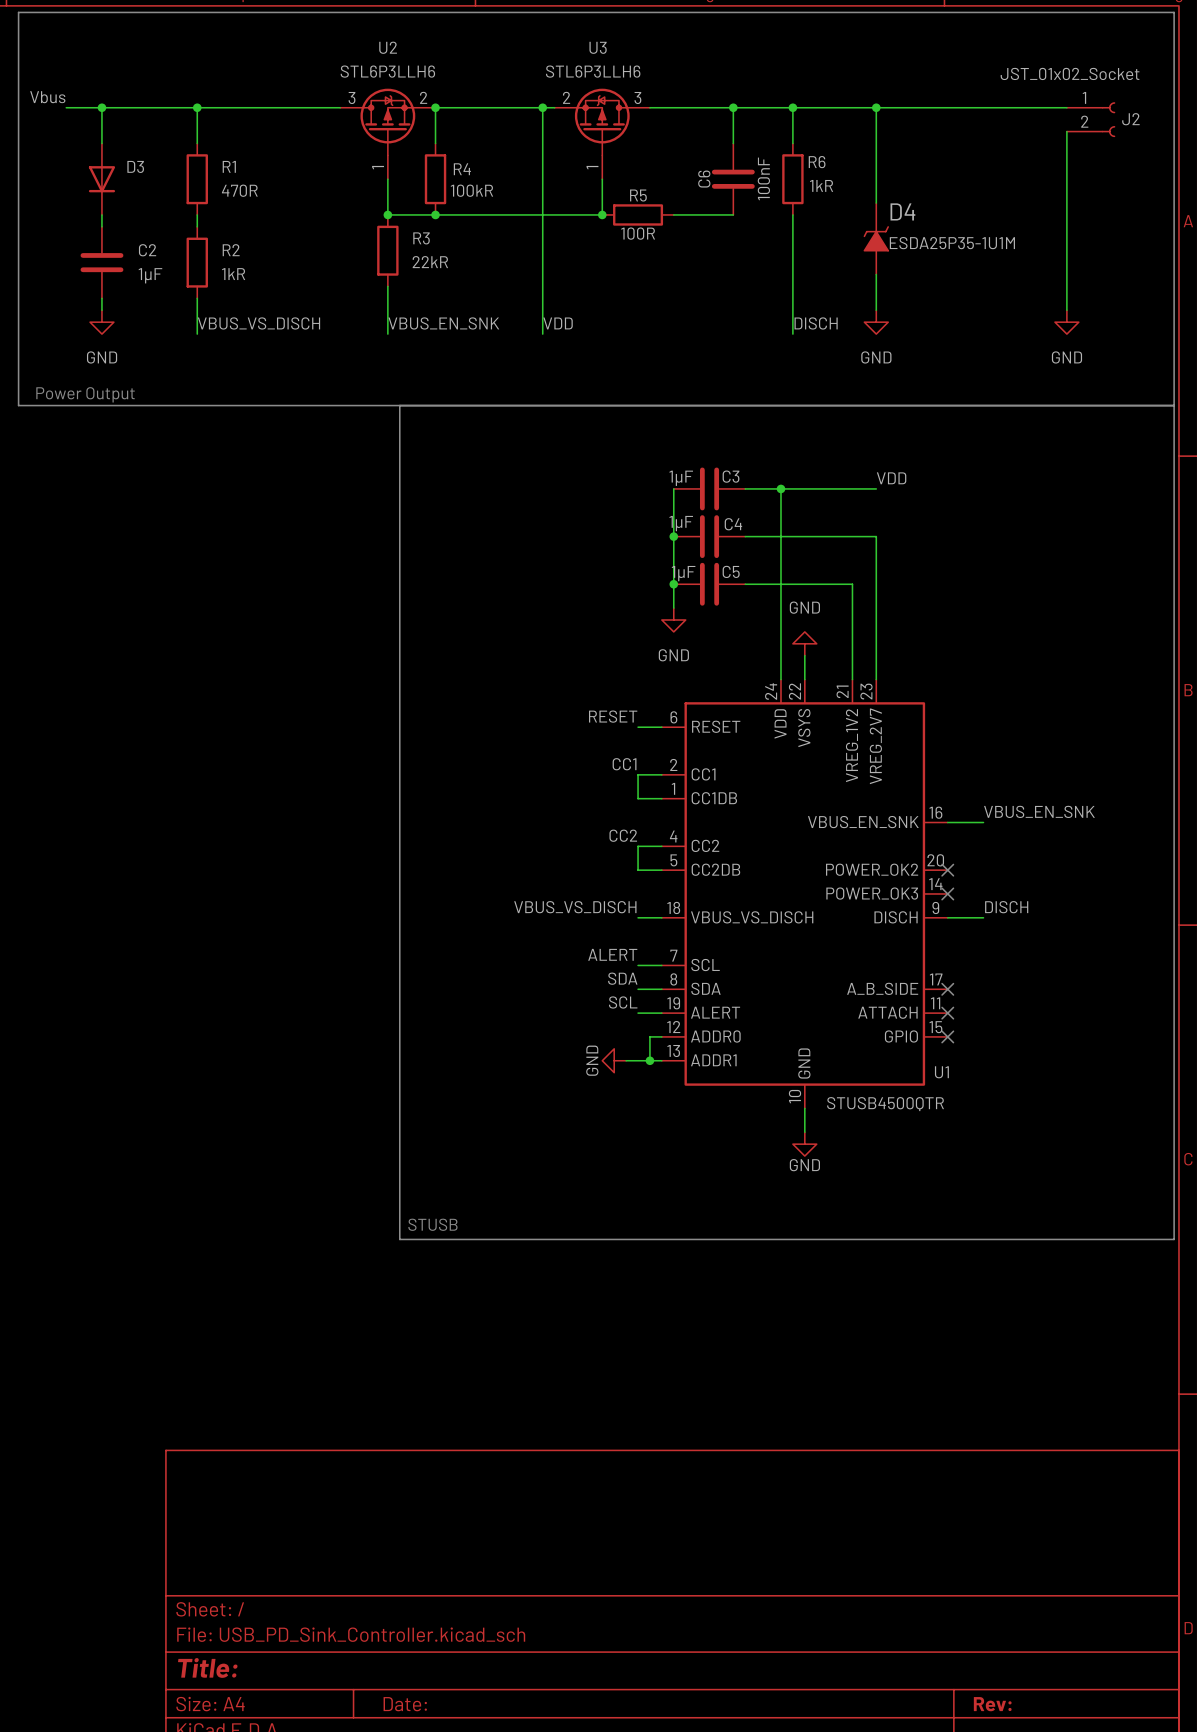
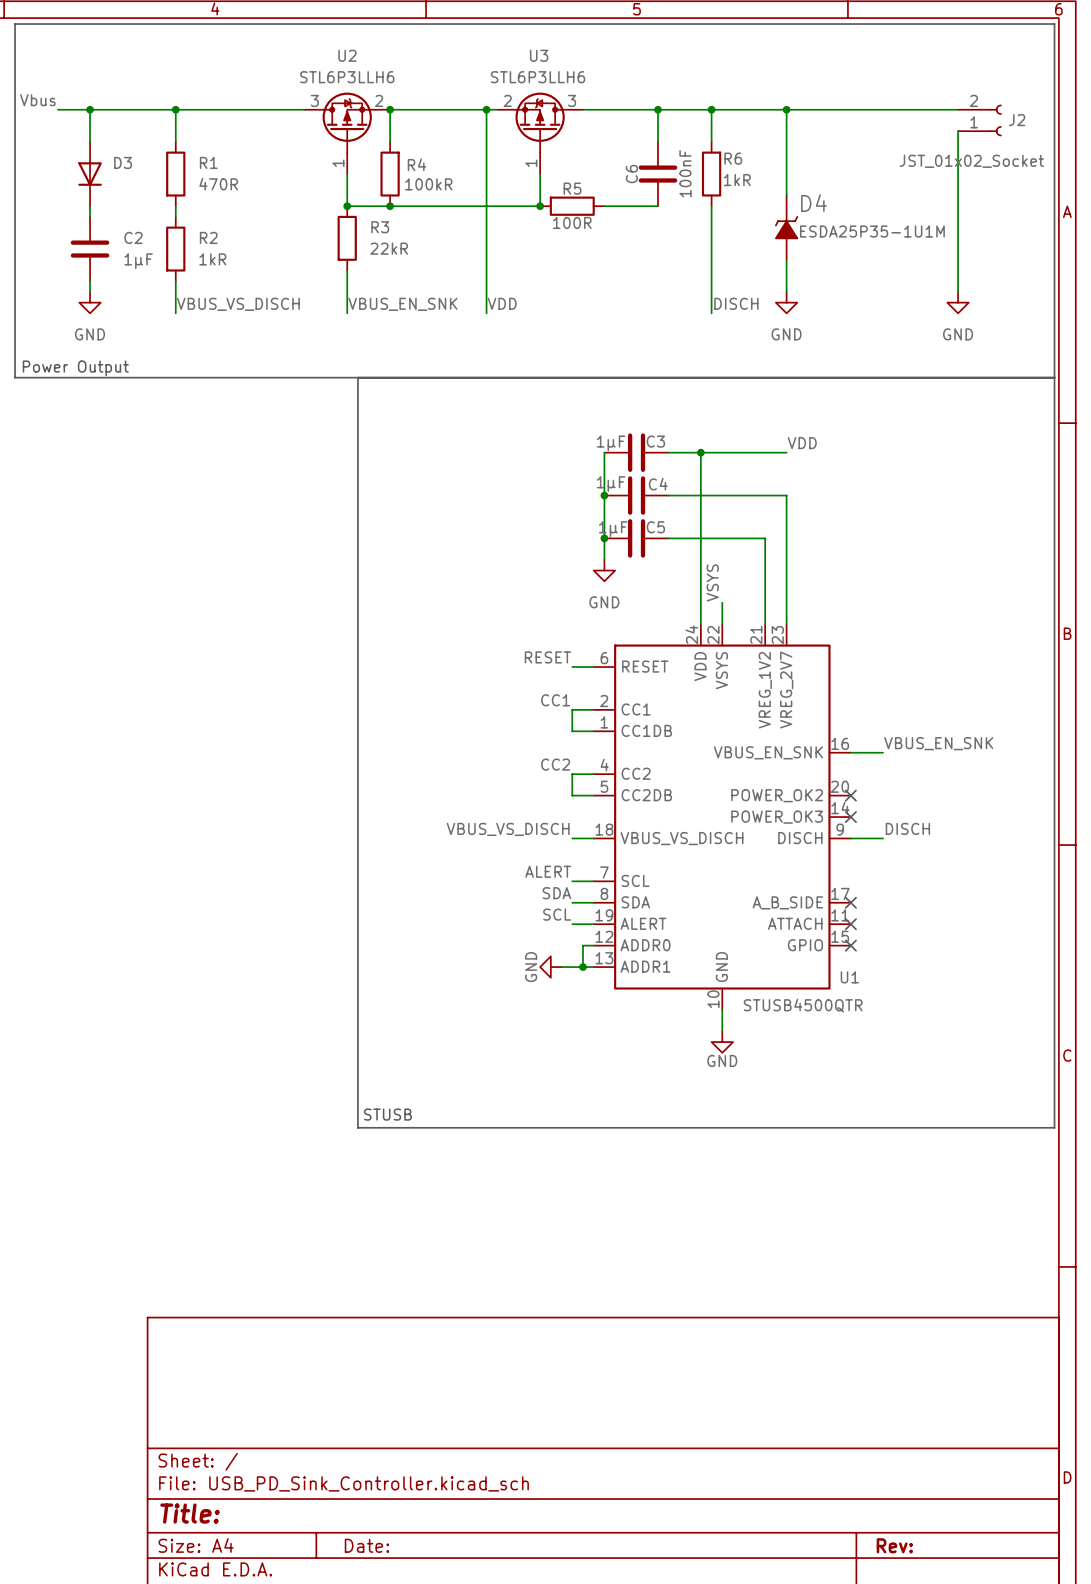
J2 flip: as is (1108, 119) -> up-down (995, 120)
label: none -> VSYS (712, 582)
power symbol: GND (804, 643) -> none

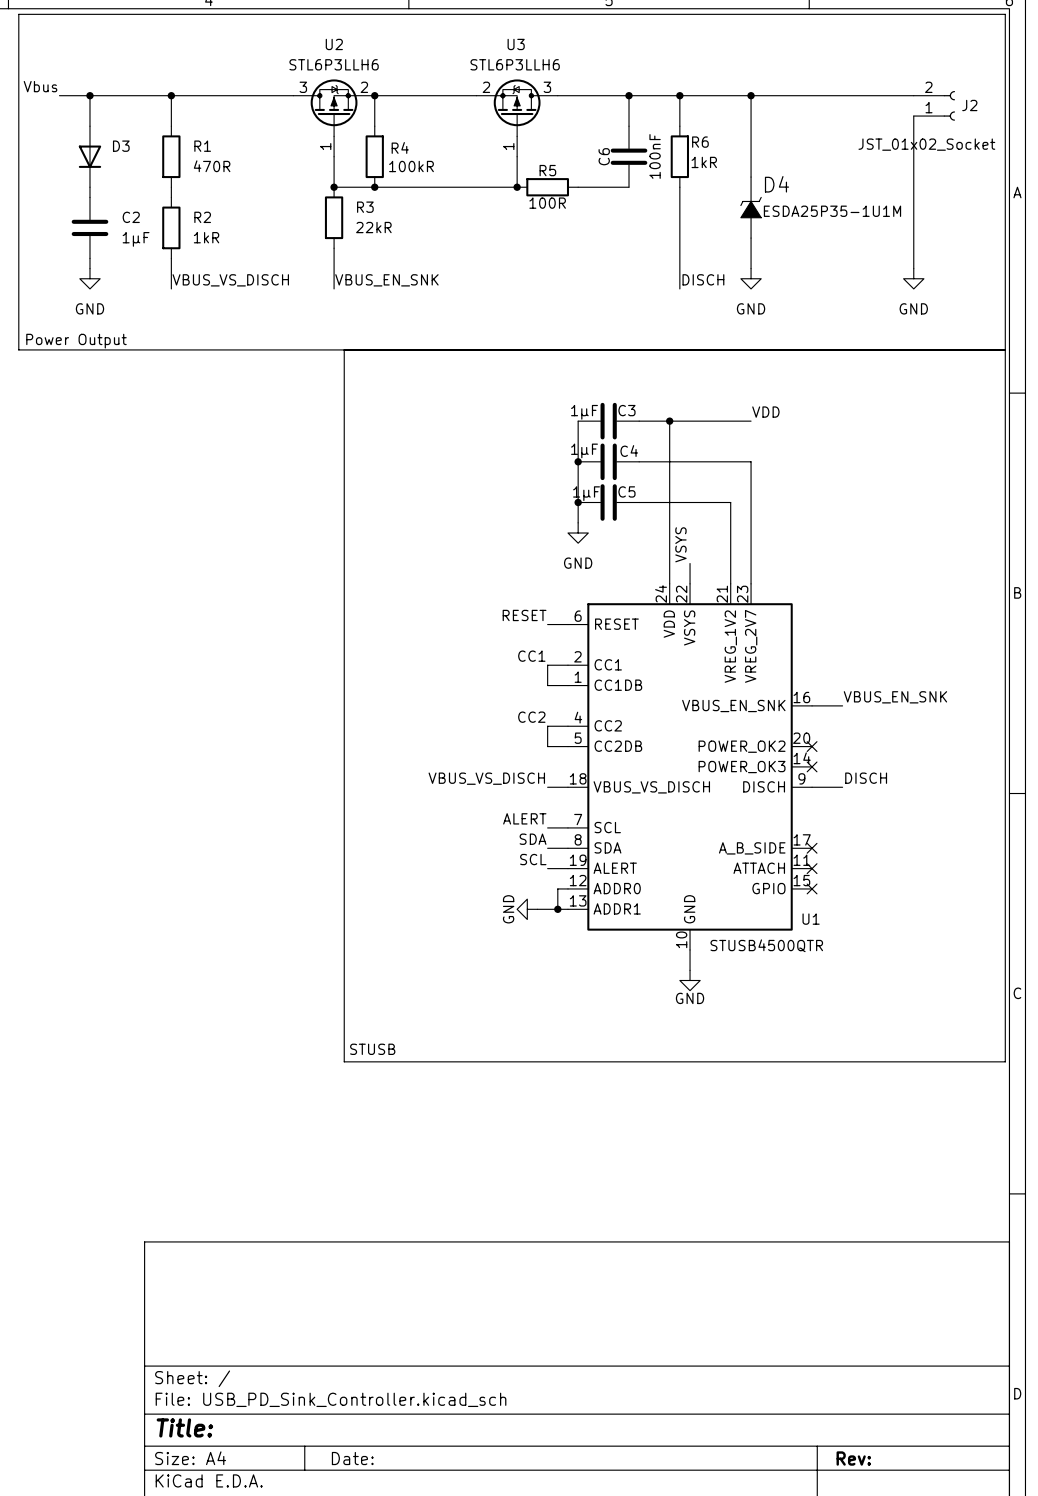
wire: (486, 109) (486, 313) -> none
junction: (486, 109) -> none
label: VDD (502, 303) -> none

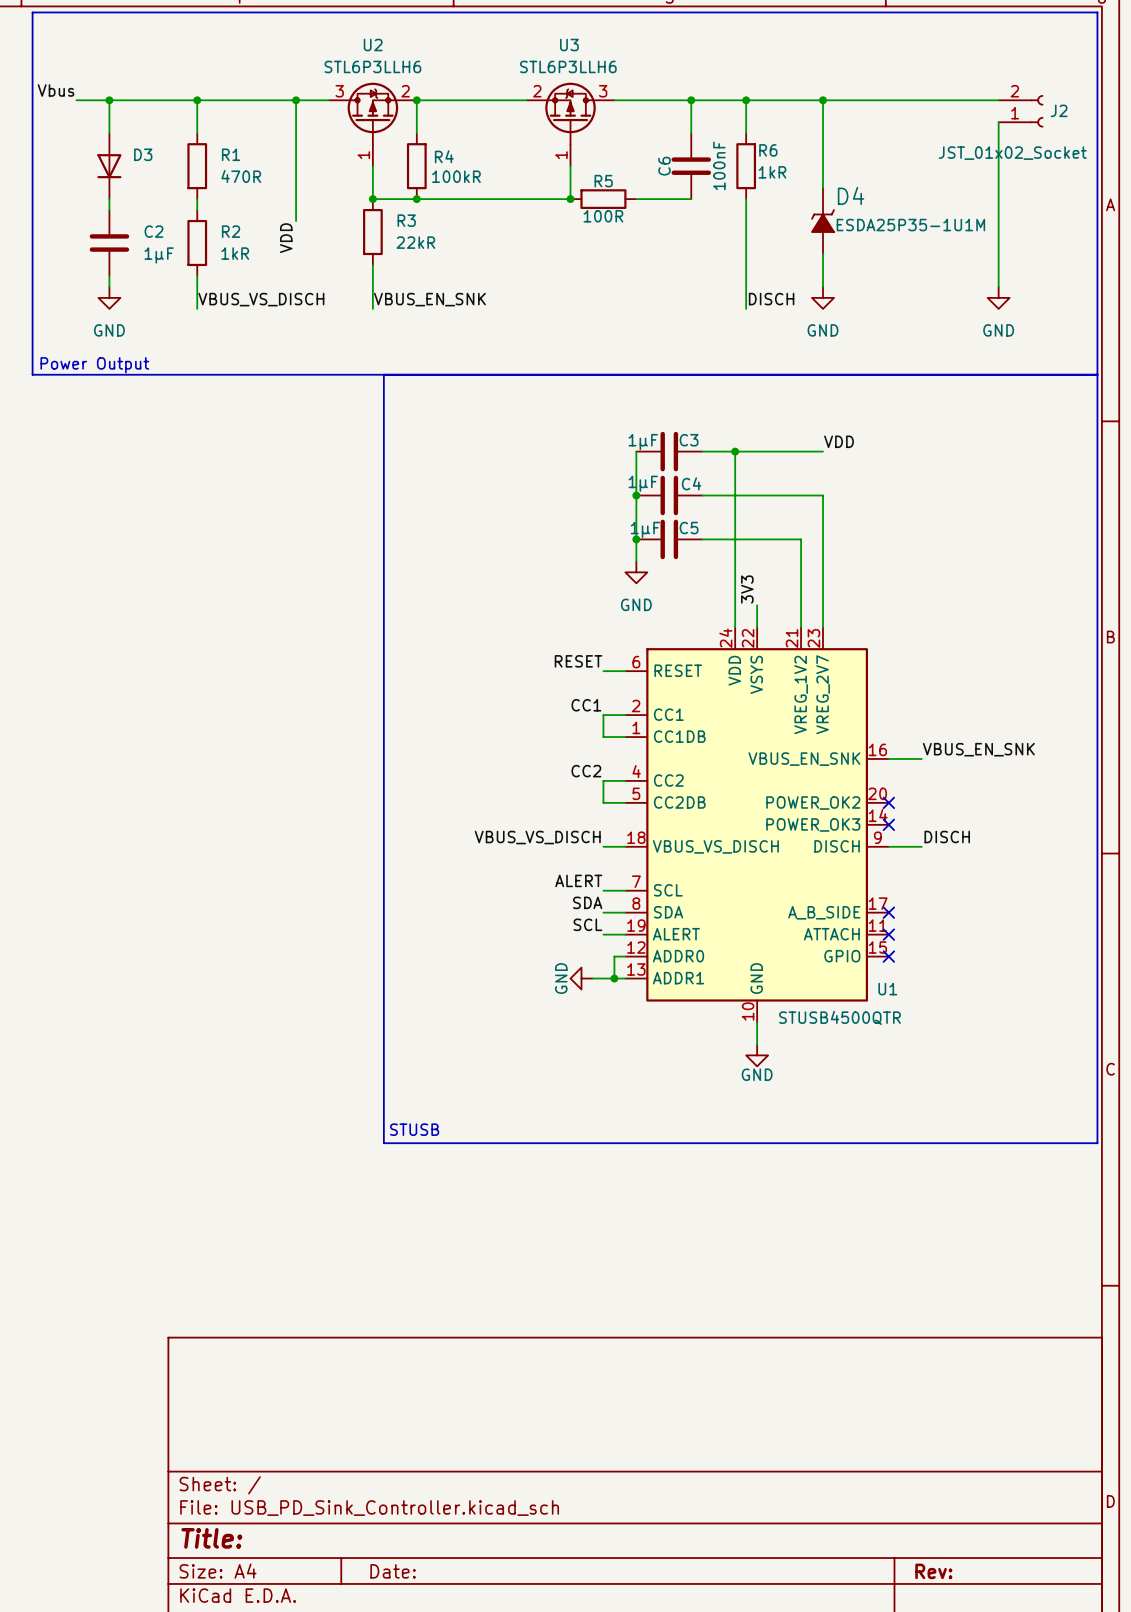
wire: none -> (296, 100) (296, 221)
junction: none -> (296, 100)
label: none -> VDD (286, 238)
label: VSYS (680, 544) -> 3V3 (747, 589)

